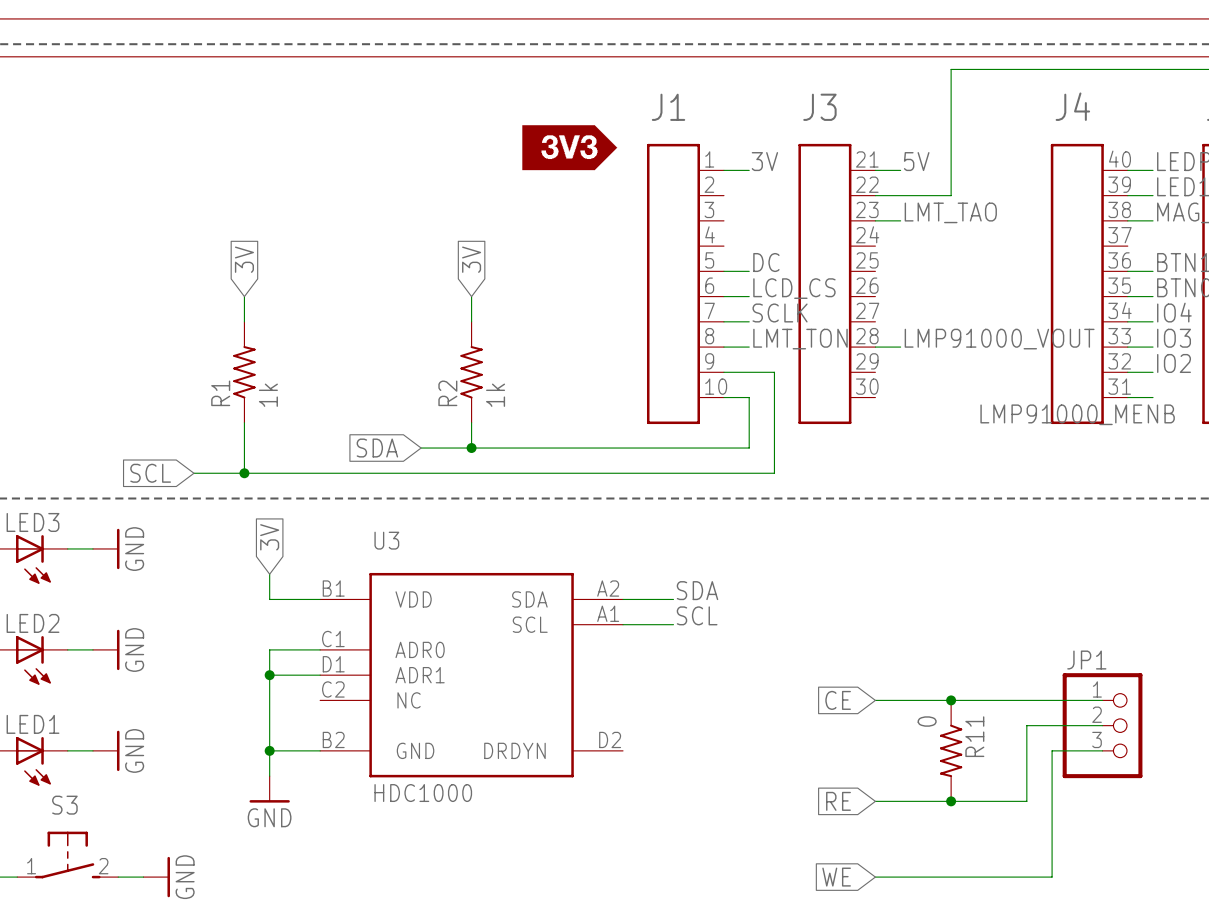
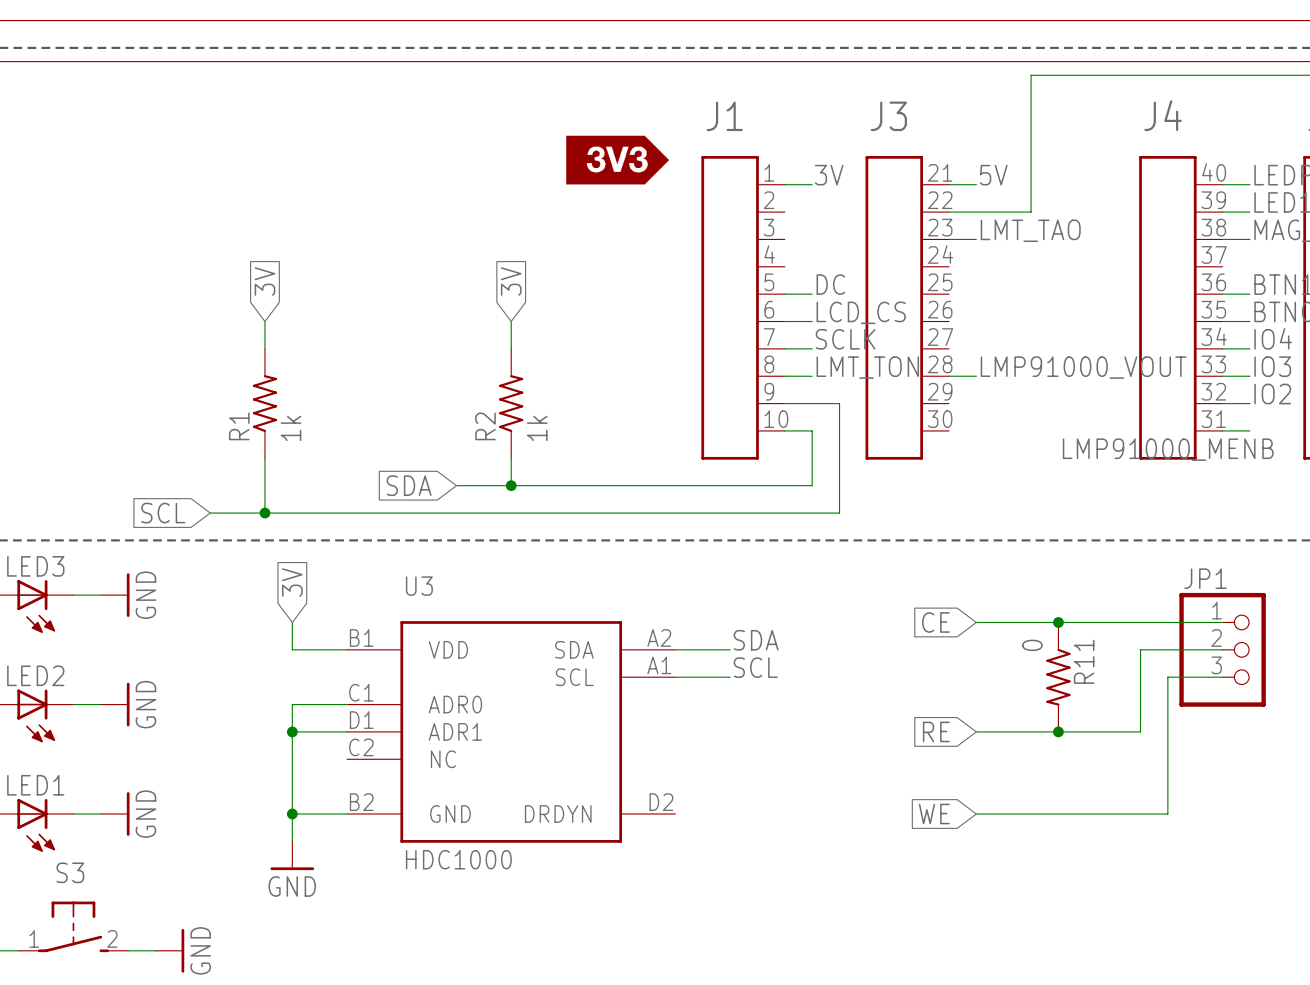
junction: none -> (1058, 622)
global label position: CE (838, 700) -> CE (935, 622)
wire: (875, 700) (1102, 700) -> (976, 622) (1222, 622)
junction position: (951, 700) -> (1058, 731)
wire: (1102, 725) (1026, 725) (1026, 801) (875, 801) -> (1222, 649) (1140, 649) (1140, 731) (976, 731)
JP1 position: (1102, 725) -> (1222, 649)
R11 position: (951, 750) -> (1058, 677)
wire: (1052, 750) (1052, 877) (875, 877) -> (1140, 814) (976, 814)
wire: (1077, 750) (1102, 750) -> (1167, 814) (1167, 677) (1222, 677)
global label position: RE (838, 801) -> RE (936, 731)
junction: (951, 801) -> none
global label position: WE (836, 877) -> WE (934, 814)

